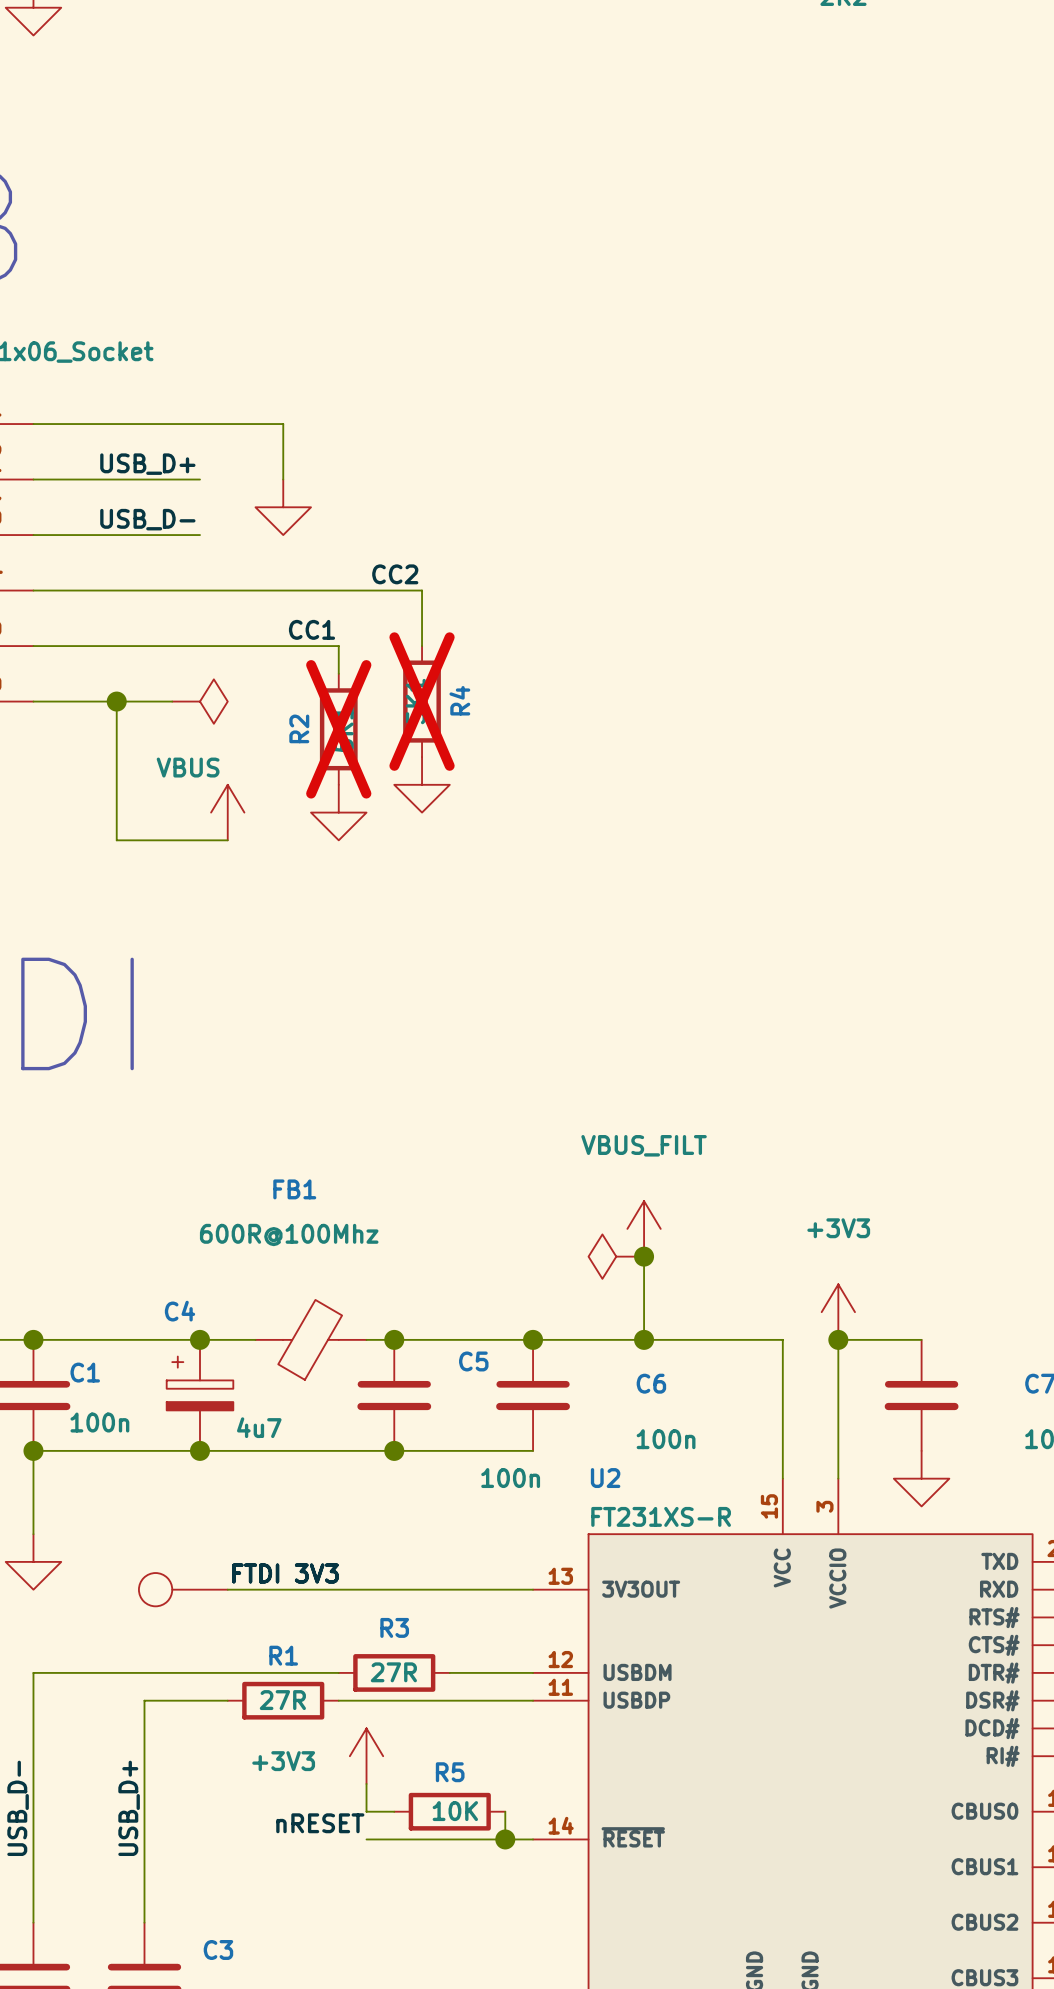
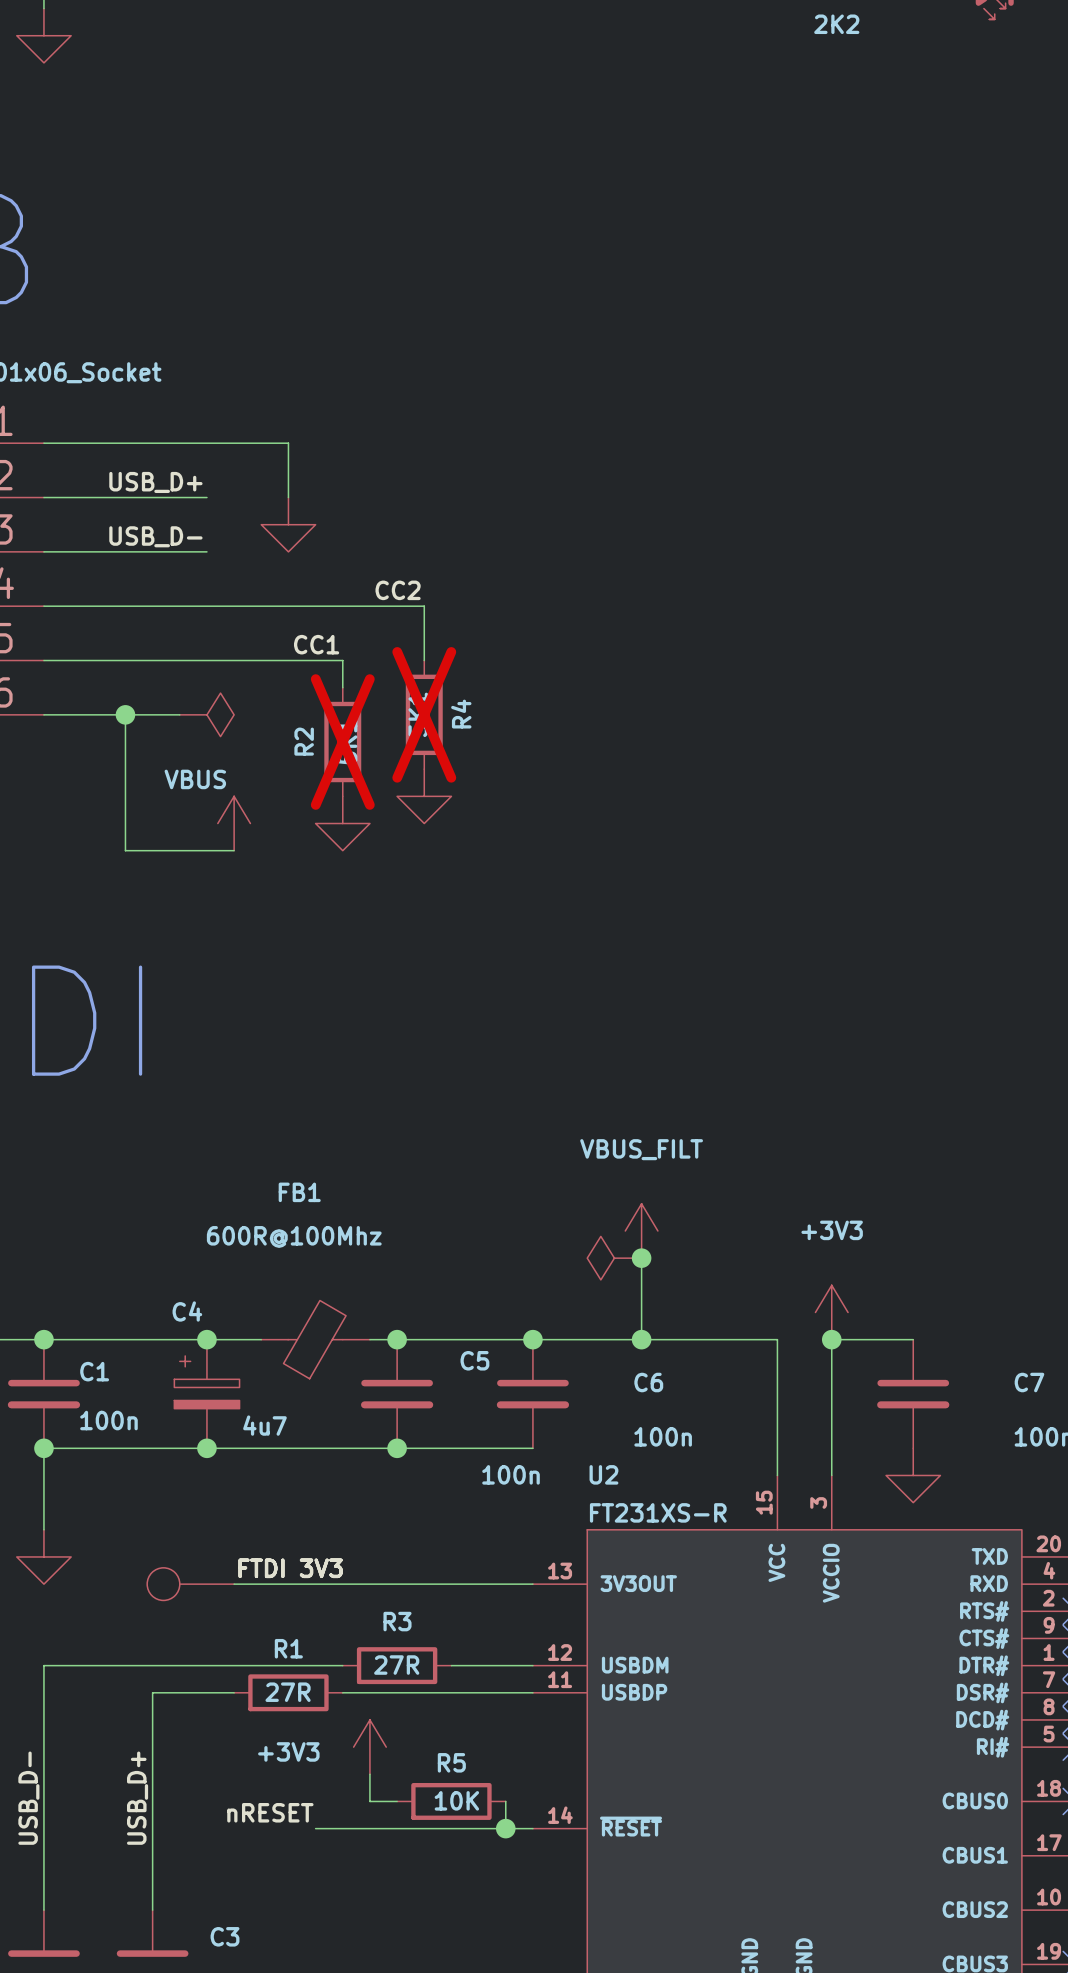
label position: nRESET (320, 1823) -> nRESET (270, 1812)
wire: none -> (315, 1828) (369, 1828)

